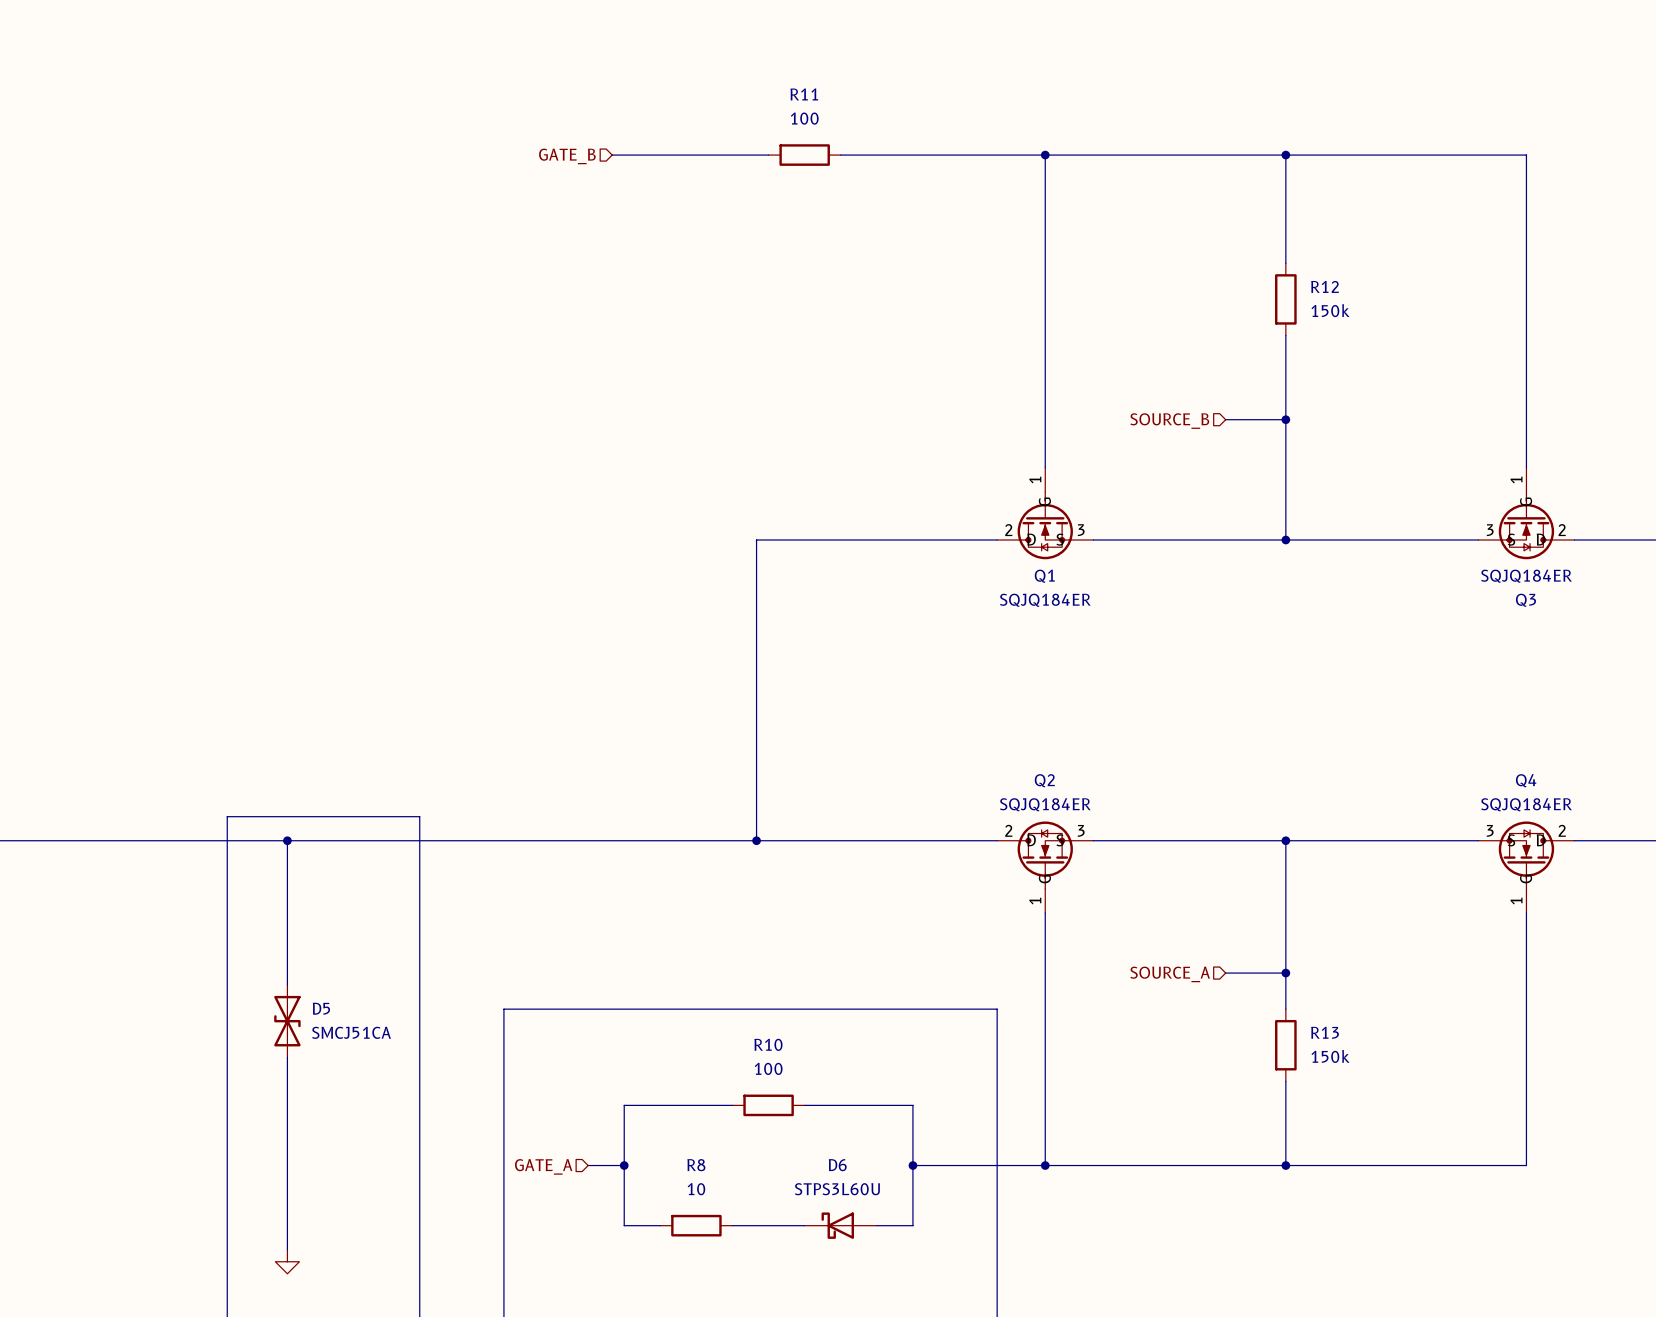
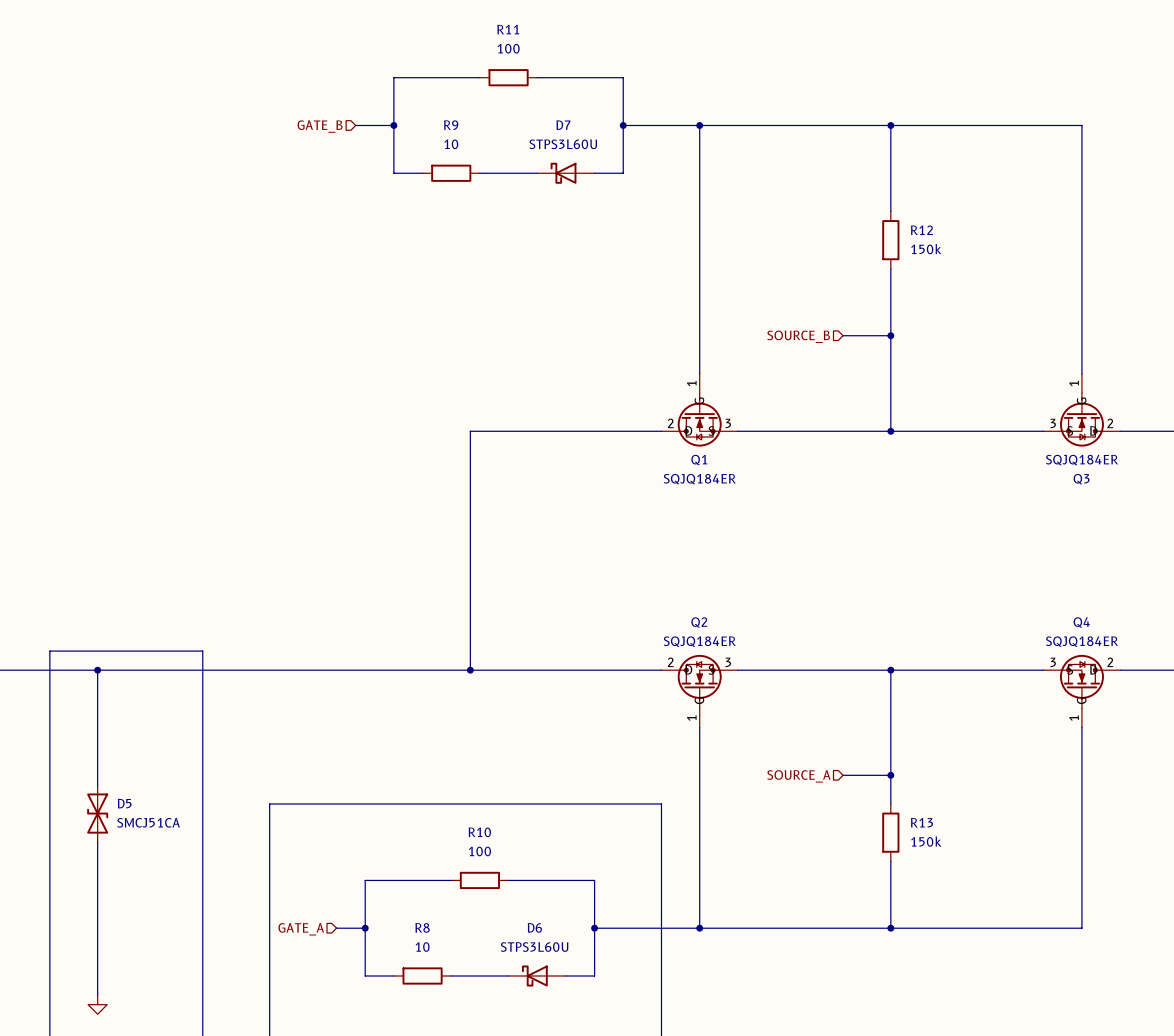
wire: none -> (479, 77) (393, 77) (393, 173) (422, 173)
wire: none -> (537, 77) (623, 77) (623, 173) (594, 173)
wire: (660, 155) (768, 155) -> none
junction: none -> (393, 125)
R11 position: (804, 155) -> (508, 77)
wire: (840, 155) (949, 155) -> none
junction: none -> (623, 125)
R9: none -> 10 (451, 173)
wire: none -> (479, 173) (537, 173)
D7: none -> STPS3L60U (565, 173)

